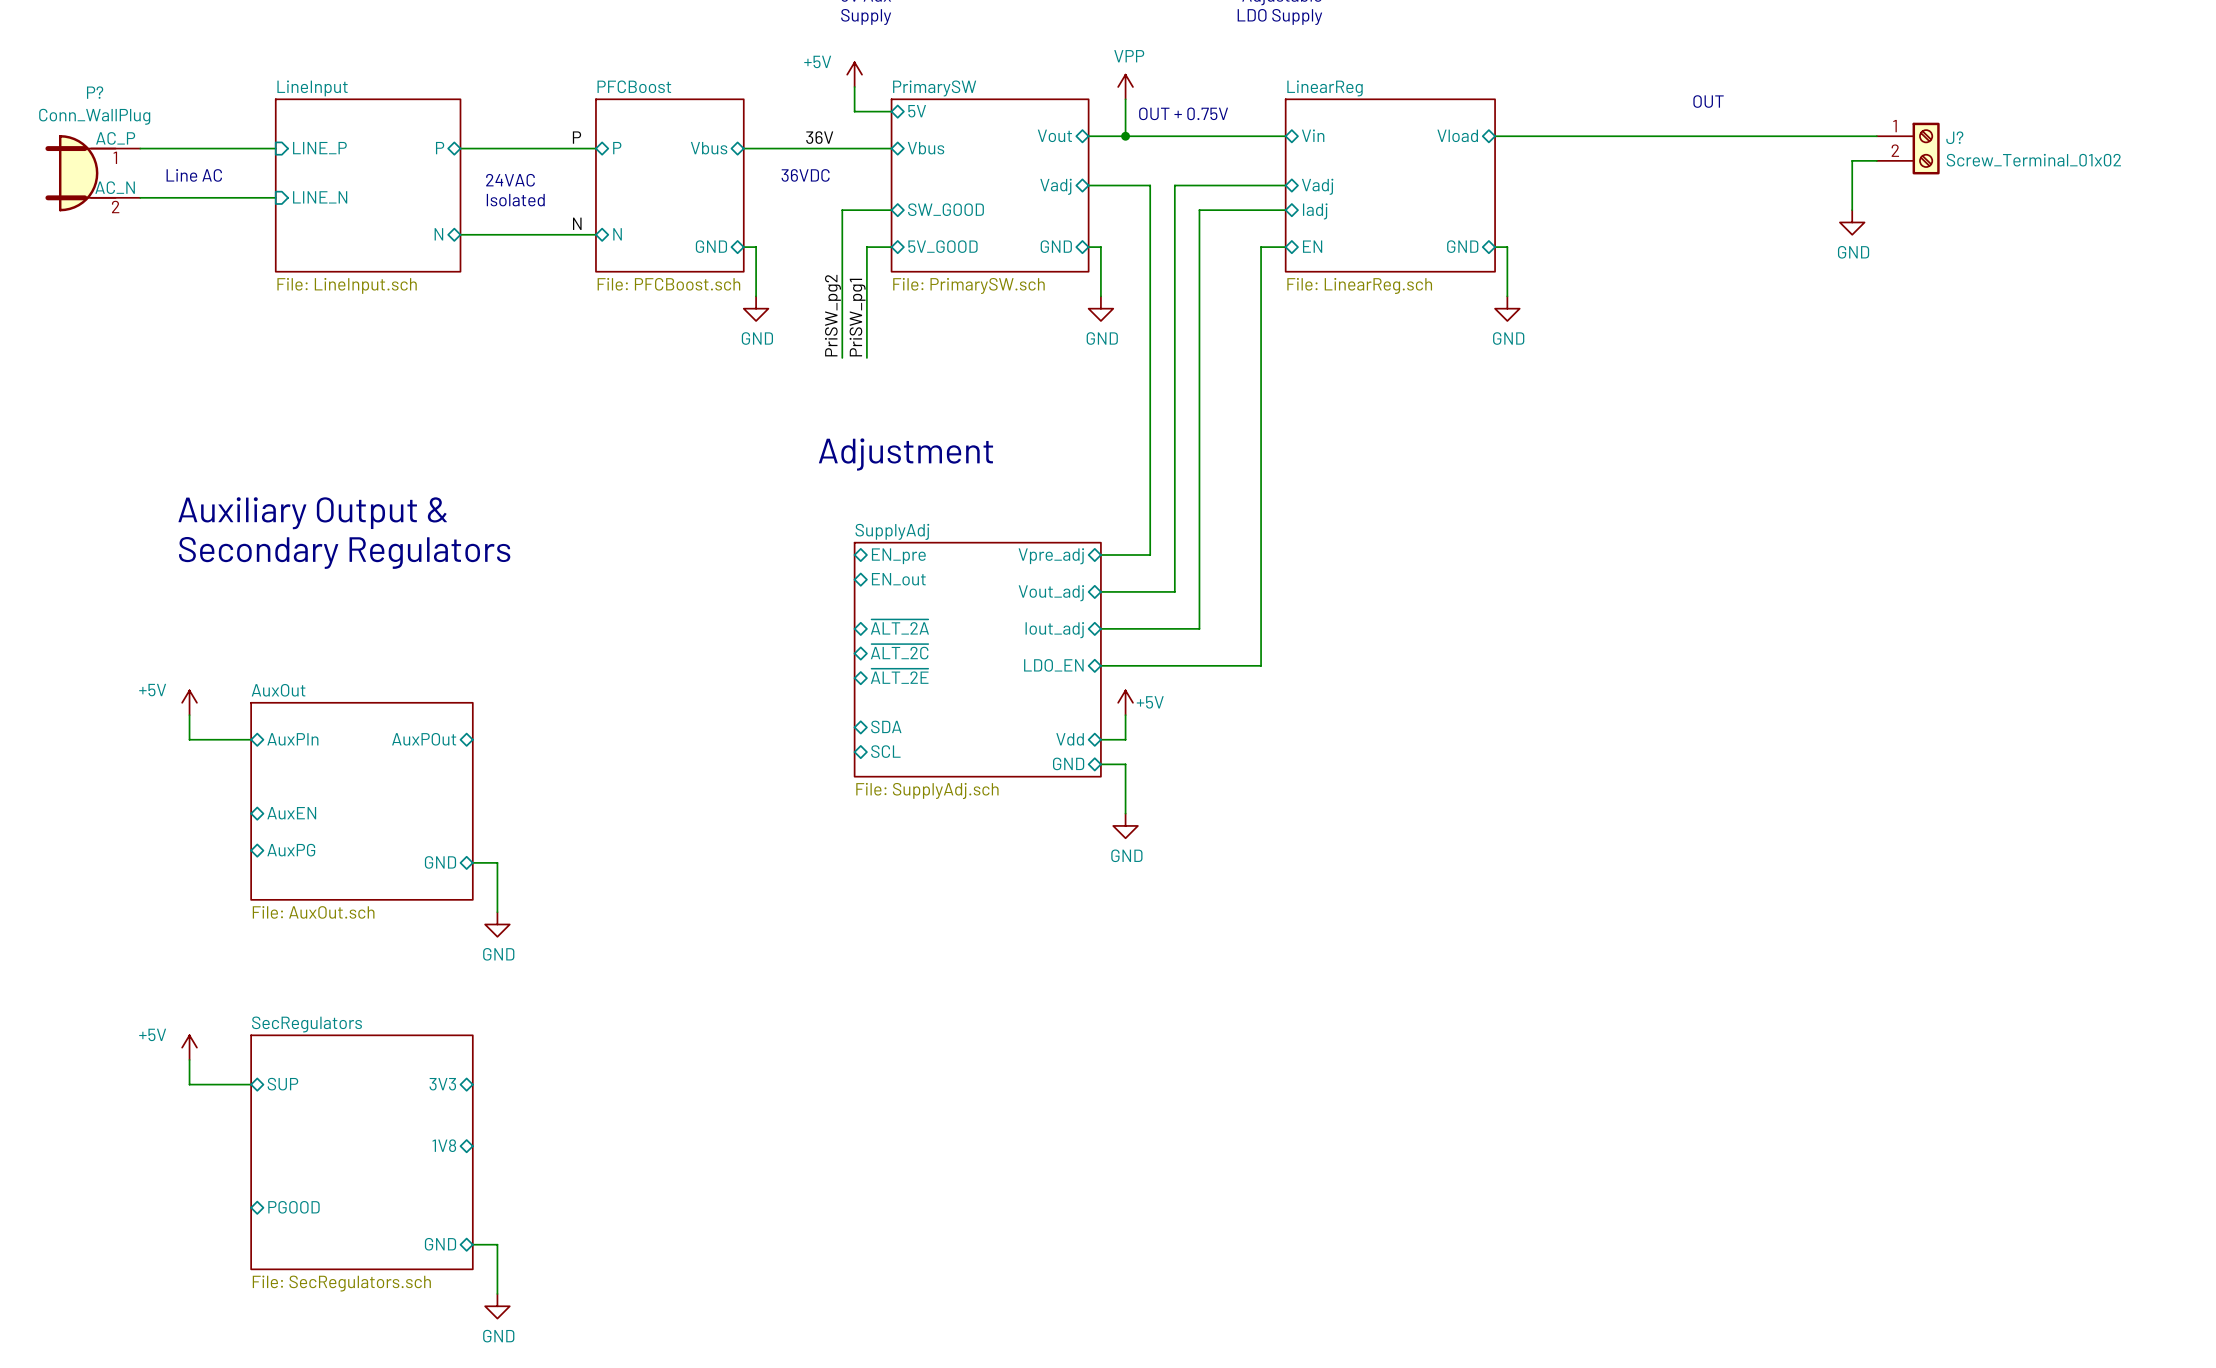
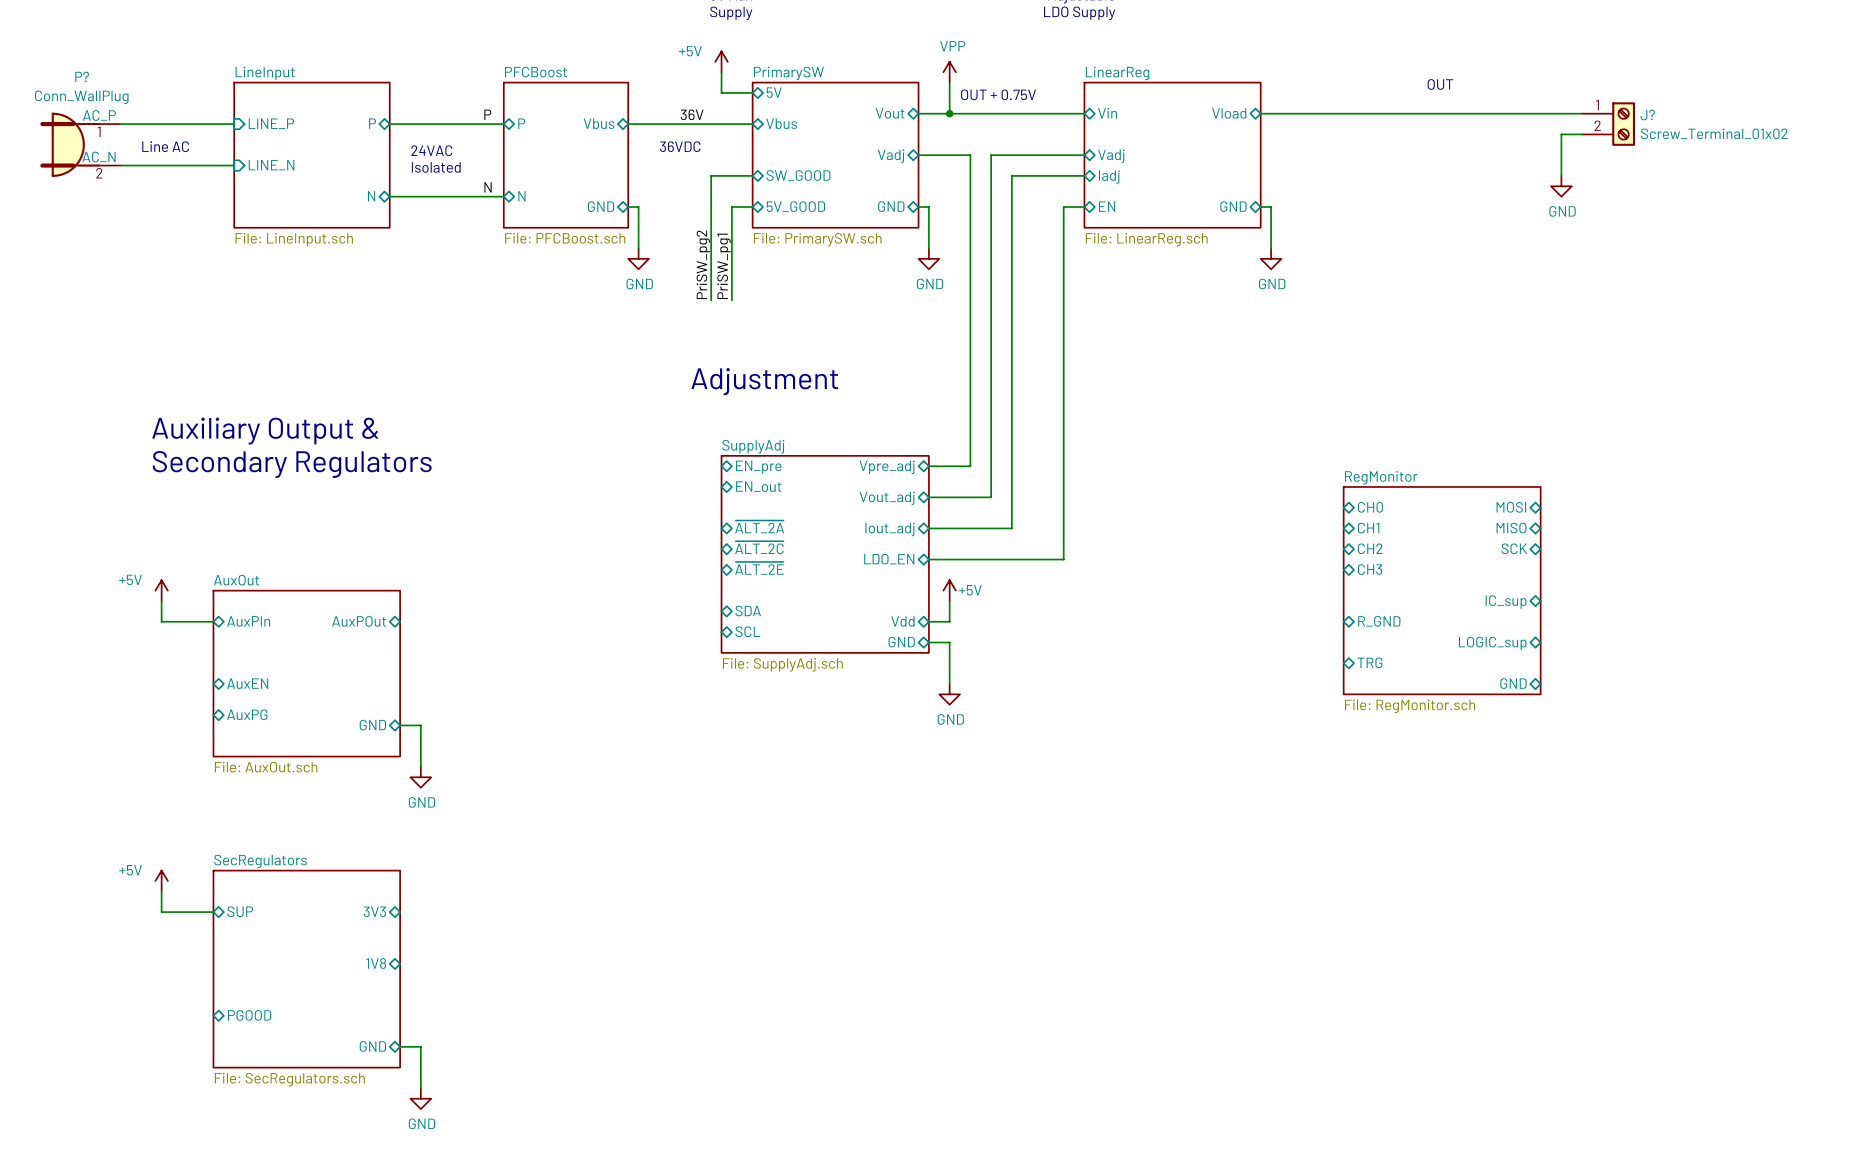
sheet pin: none -> CH0 (1370, 507)
sheet pin: none -> MOSI (1511, 507)
sheet pin: none -> CH1 (1368, 528)
sheet pin: none -> MISO (1511, 528)
sheet pin: none -> CH2 (1370, 548)
sheet pin: none -> SCK (1514, 548)
sheet pin: none -> CH3 (1370, 569)
sheet RegMonitor: none -> File: RegMonitor.sch (1442, 590)
sheet pin: none -> IC_sup (1506, 602)
sheet pin: none -> R_GND (1379, 621)
sheet pin: none -> LOGIC_sup (1492, 643)
sheet pin: none -> TRG (1369, 662)
sheet pin: none -> GND (1513, 683)

